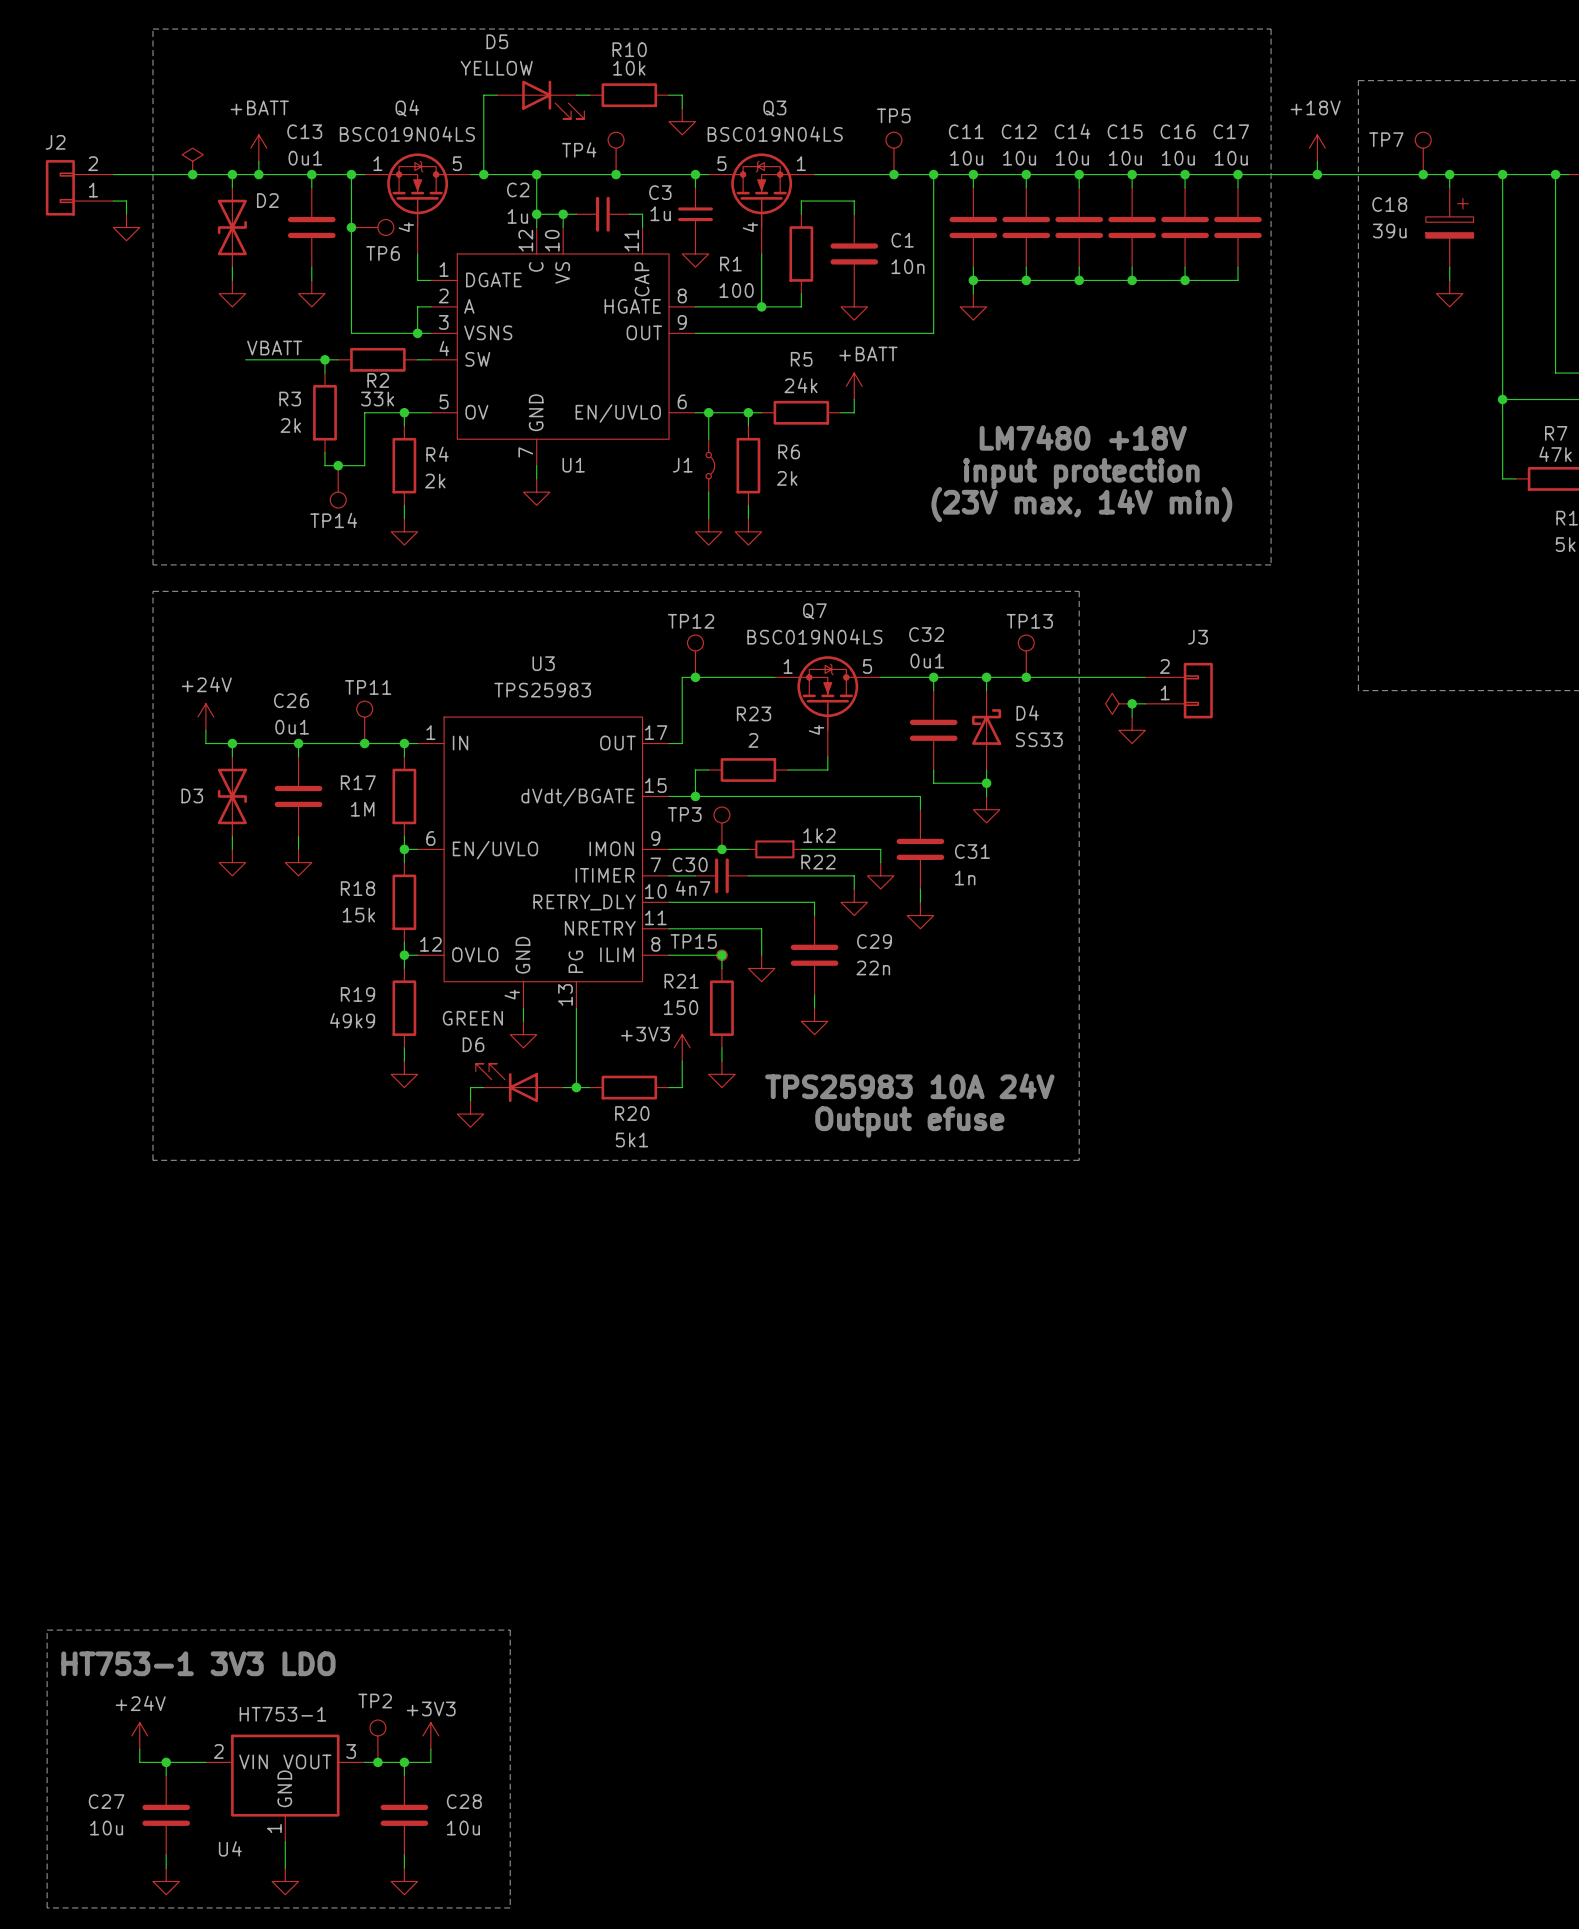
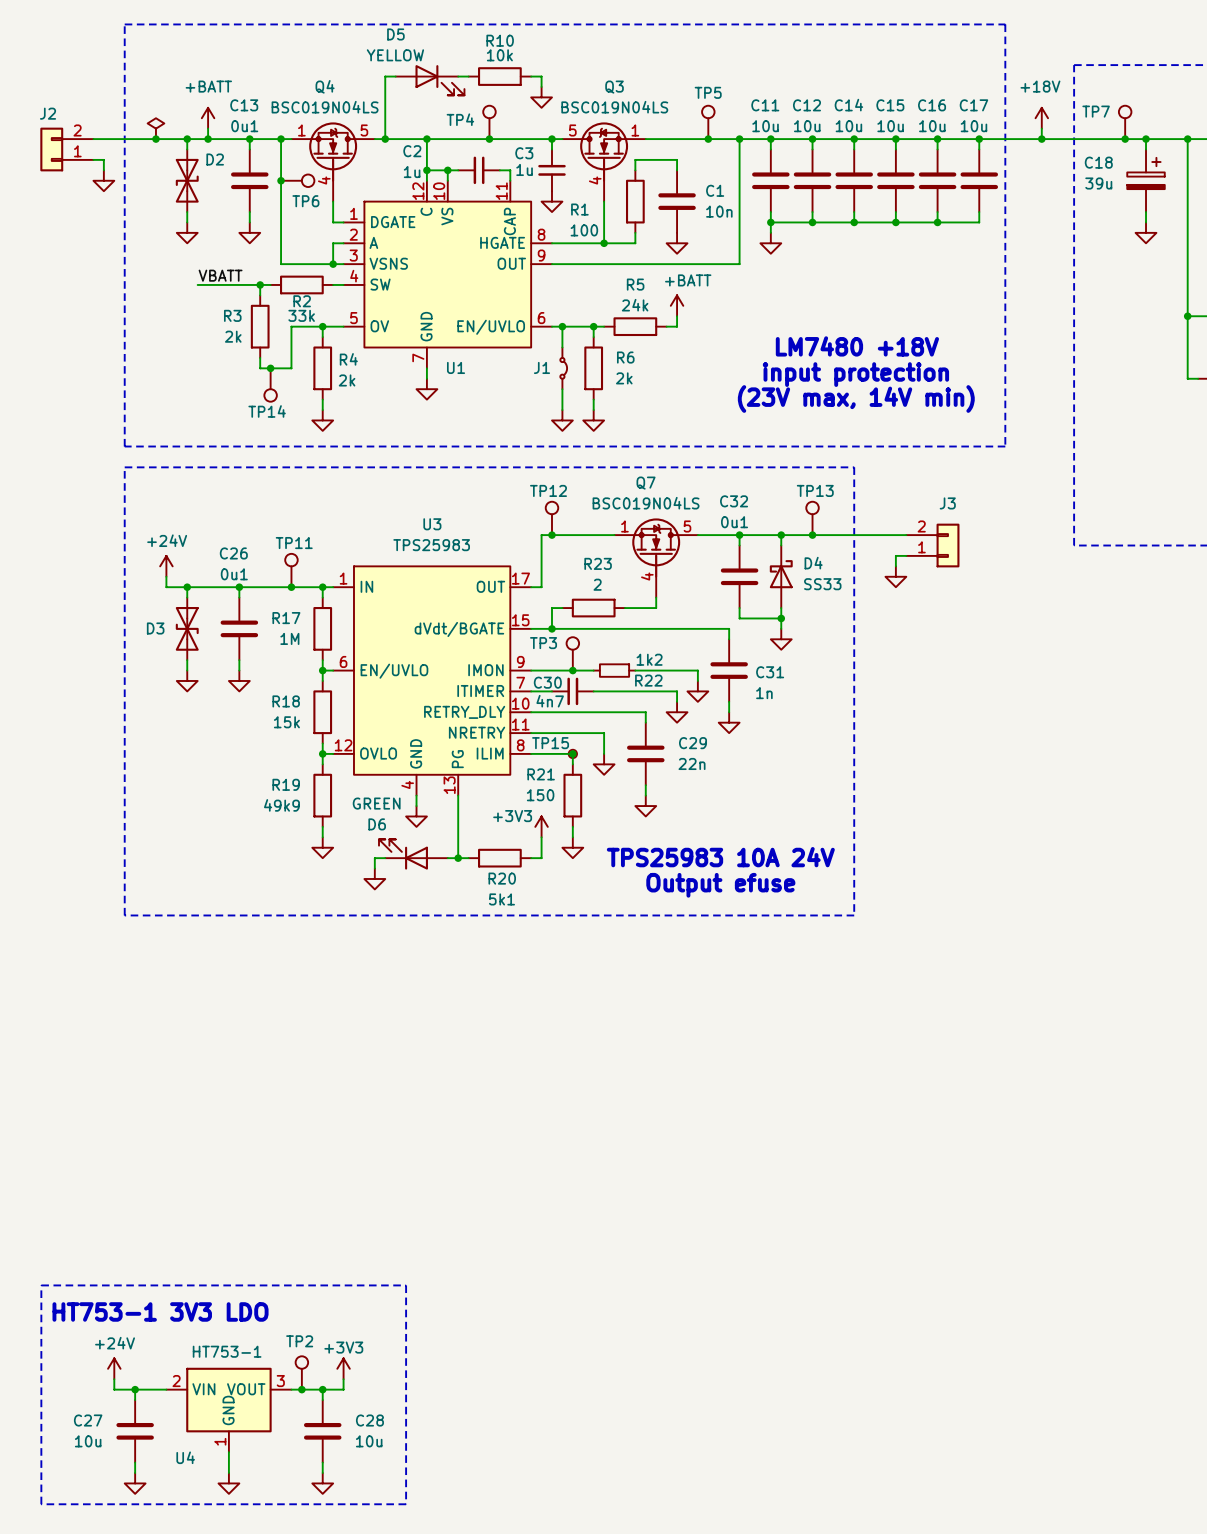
power symbol: (1118, 703) -> none
junction: (1132, 703) -> none

